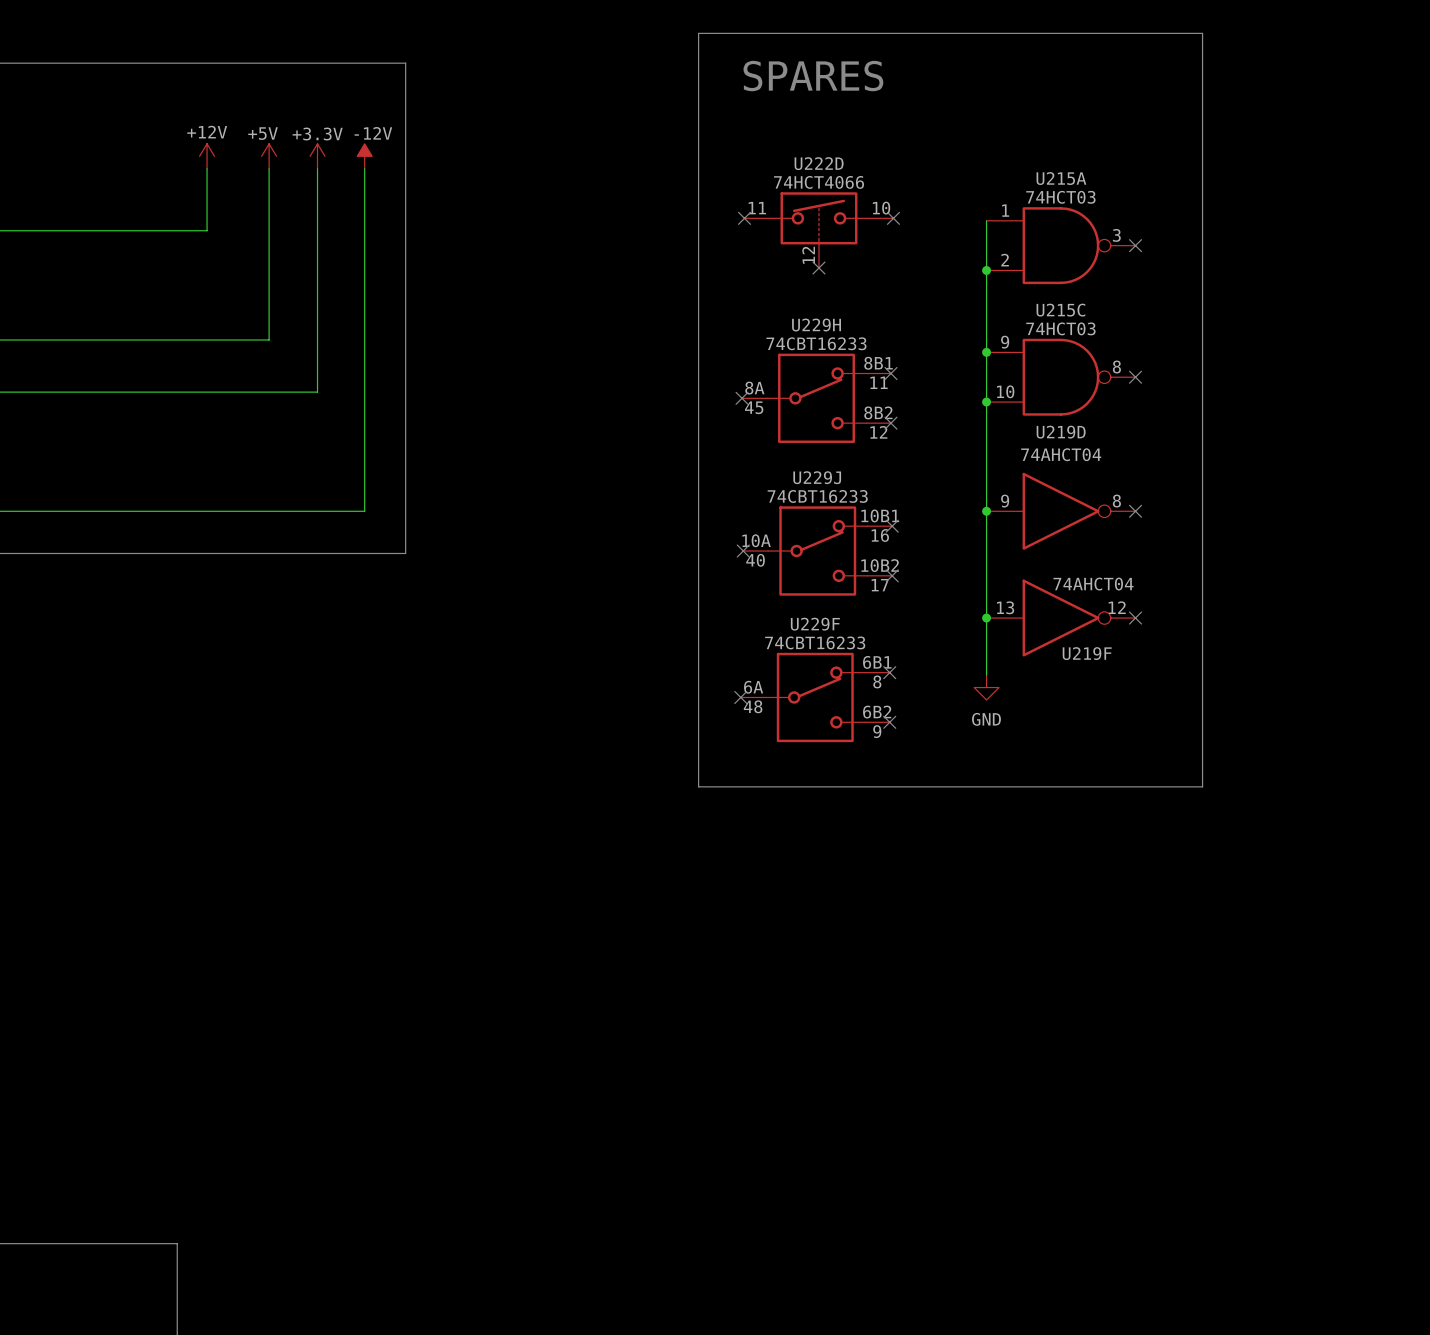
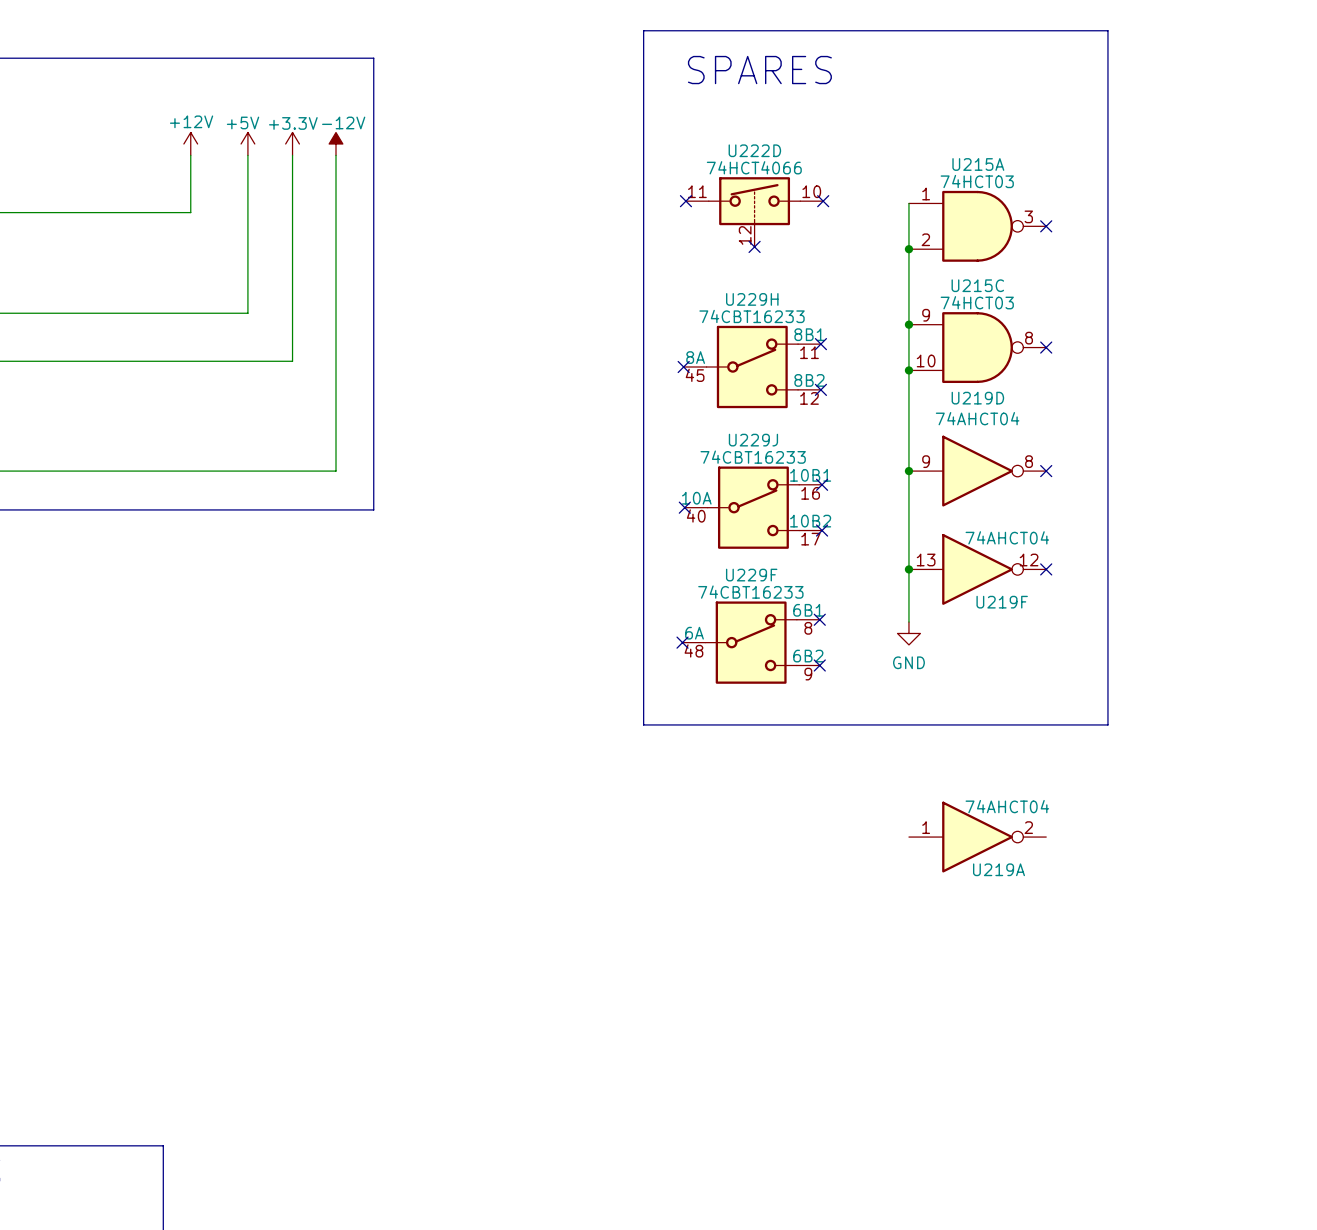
U219A: none -> 74AHCT04 (977, 837)

